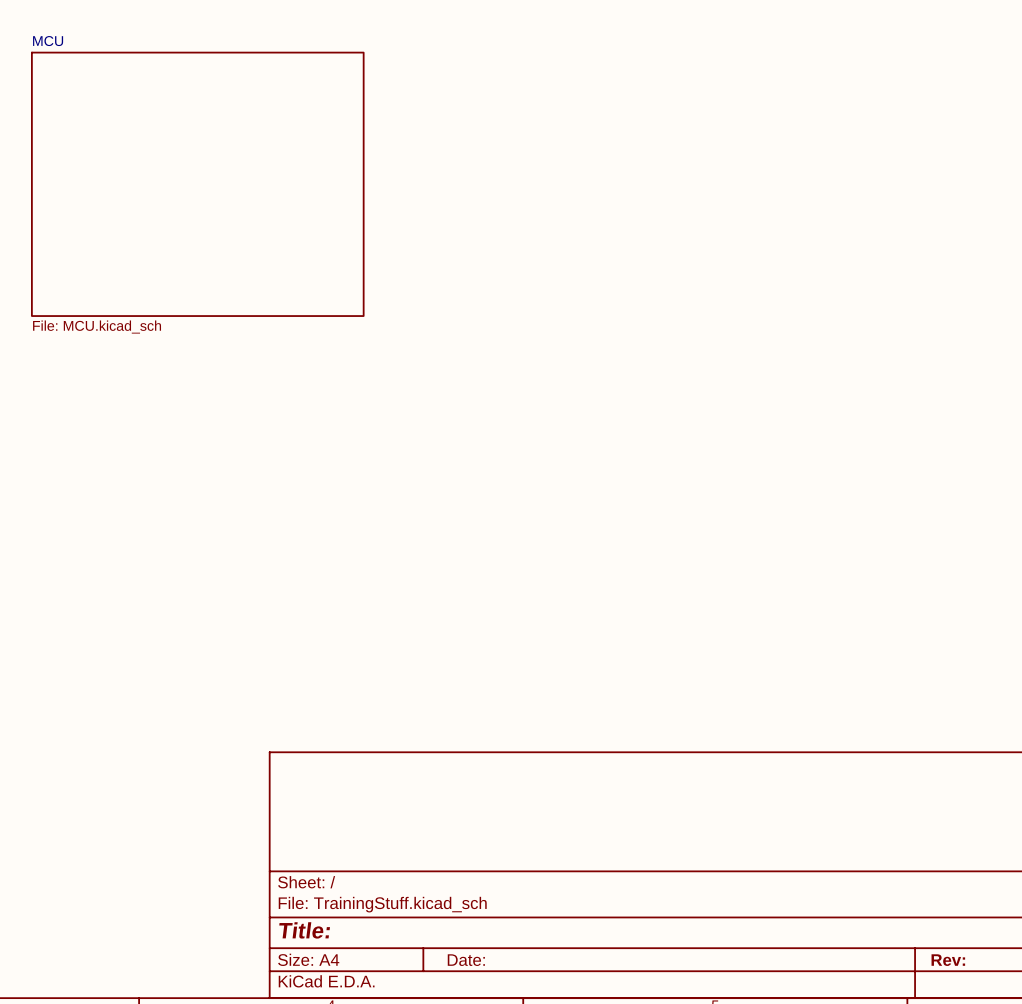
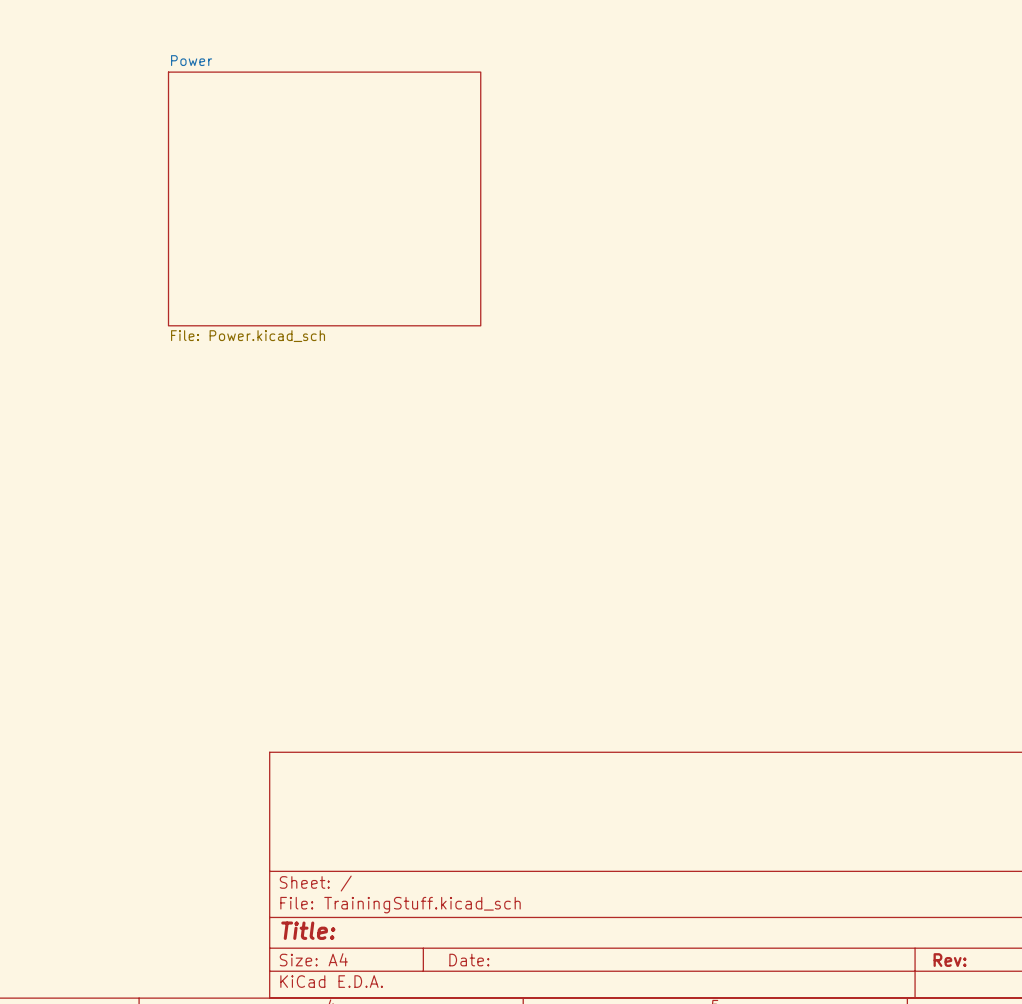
sheet MCU: File: MCU.kicad_sch (197, 184) -> none
sheet Power: none -> File: Power.kicad_sch (324, 198)

